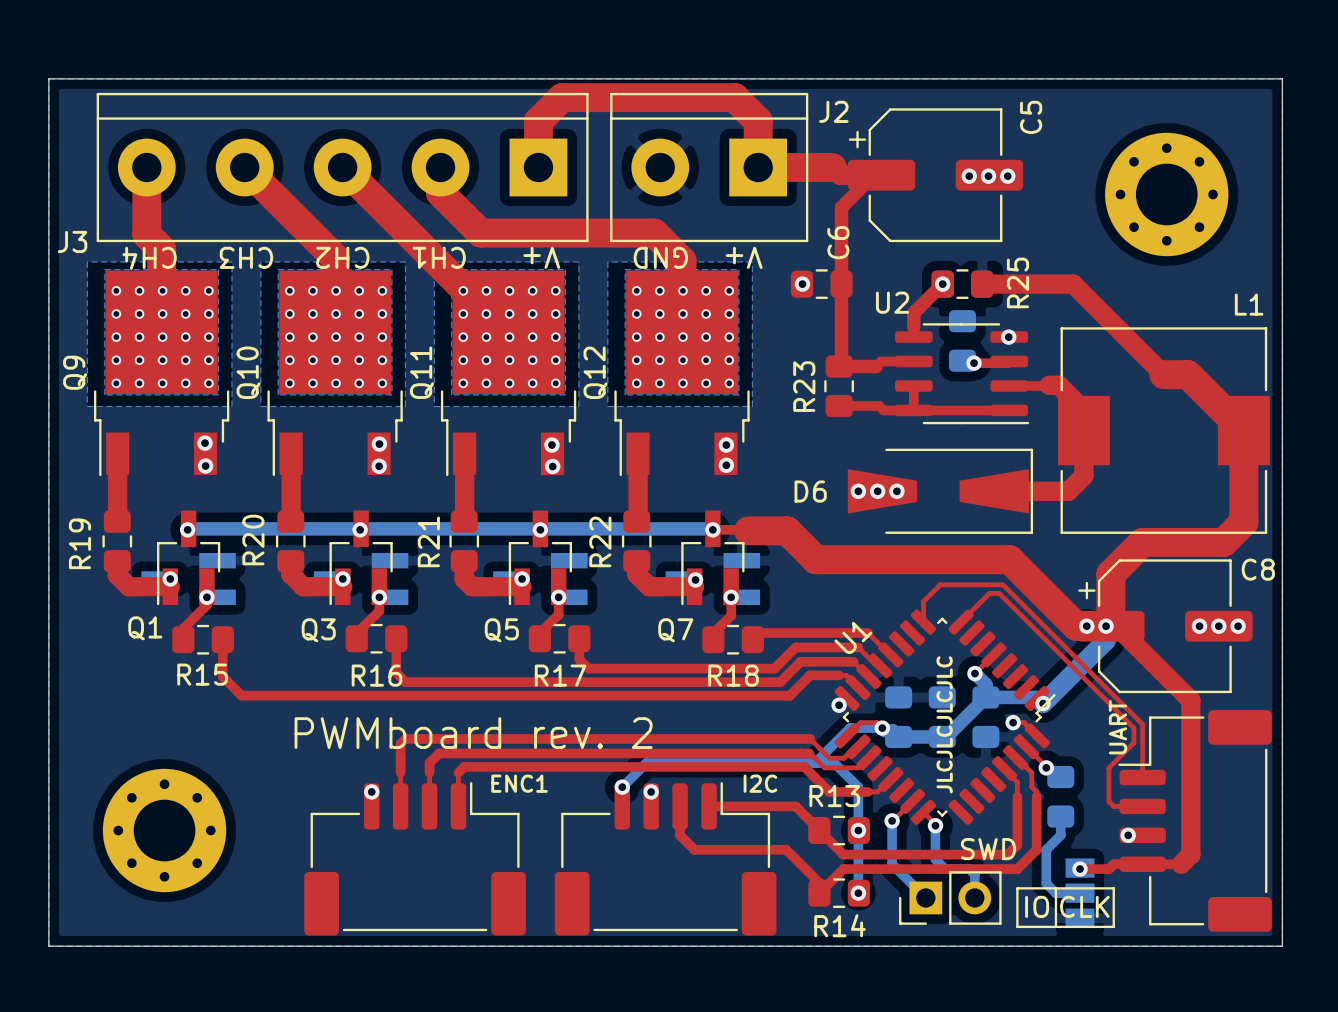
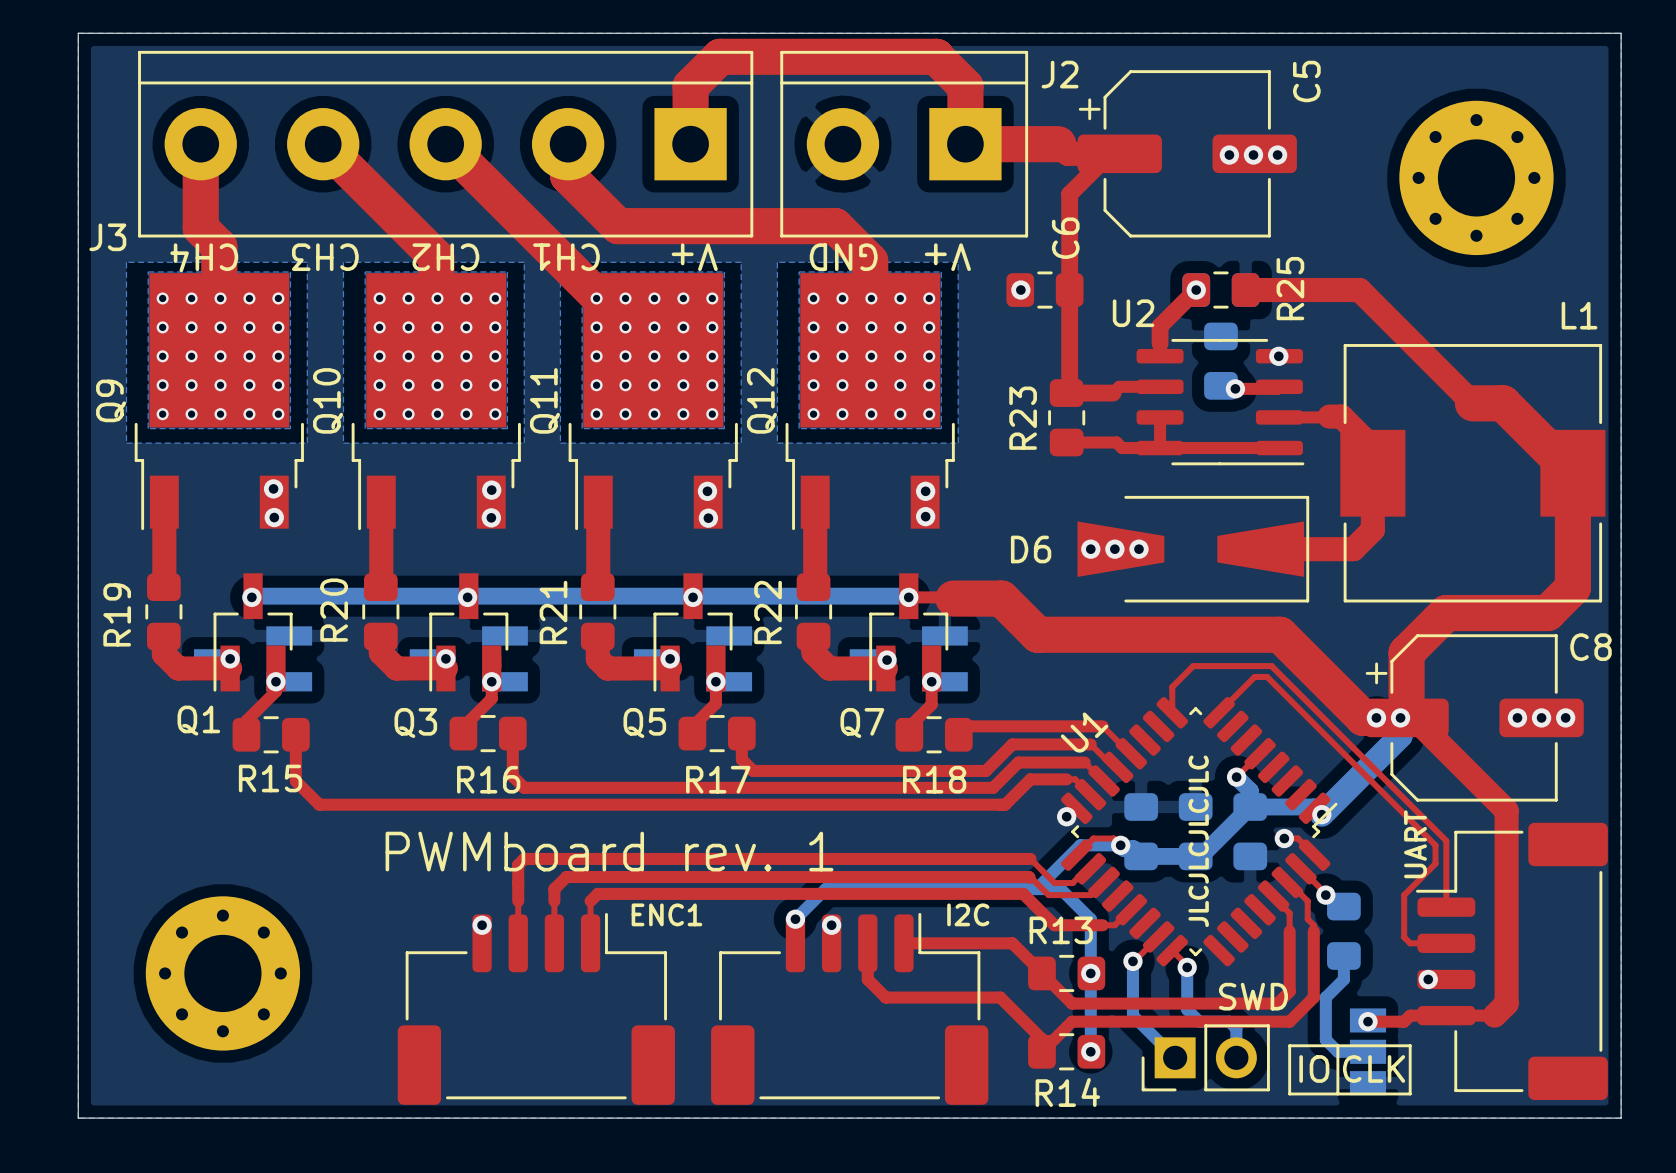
text: PWMboard rev. 2 (473, 733) -> PWMboard rev. 1 (609, 851)

